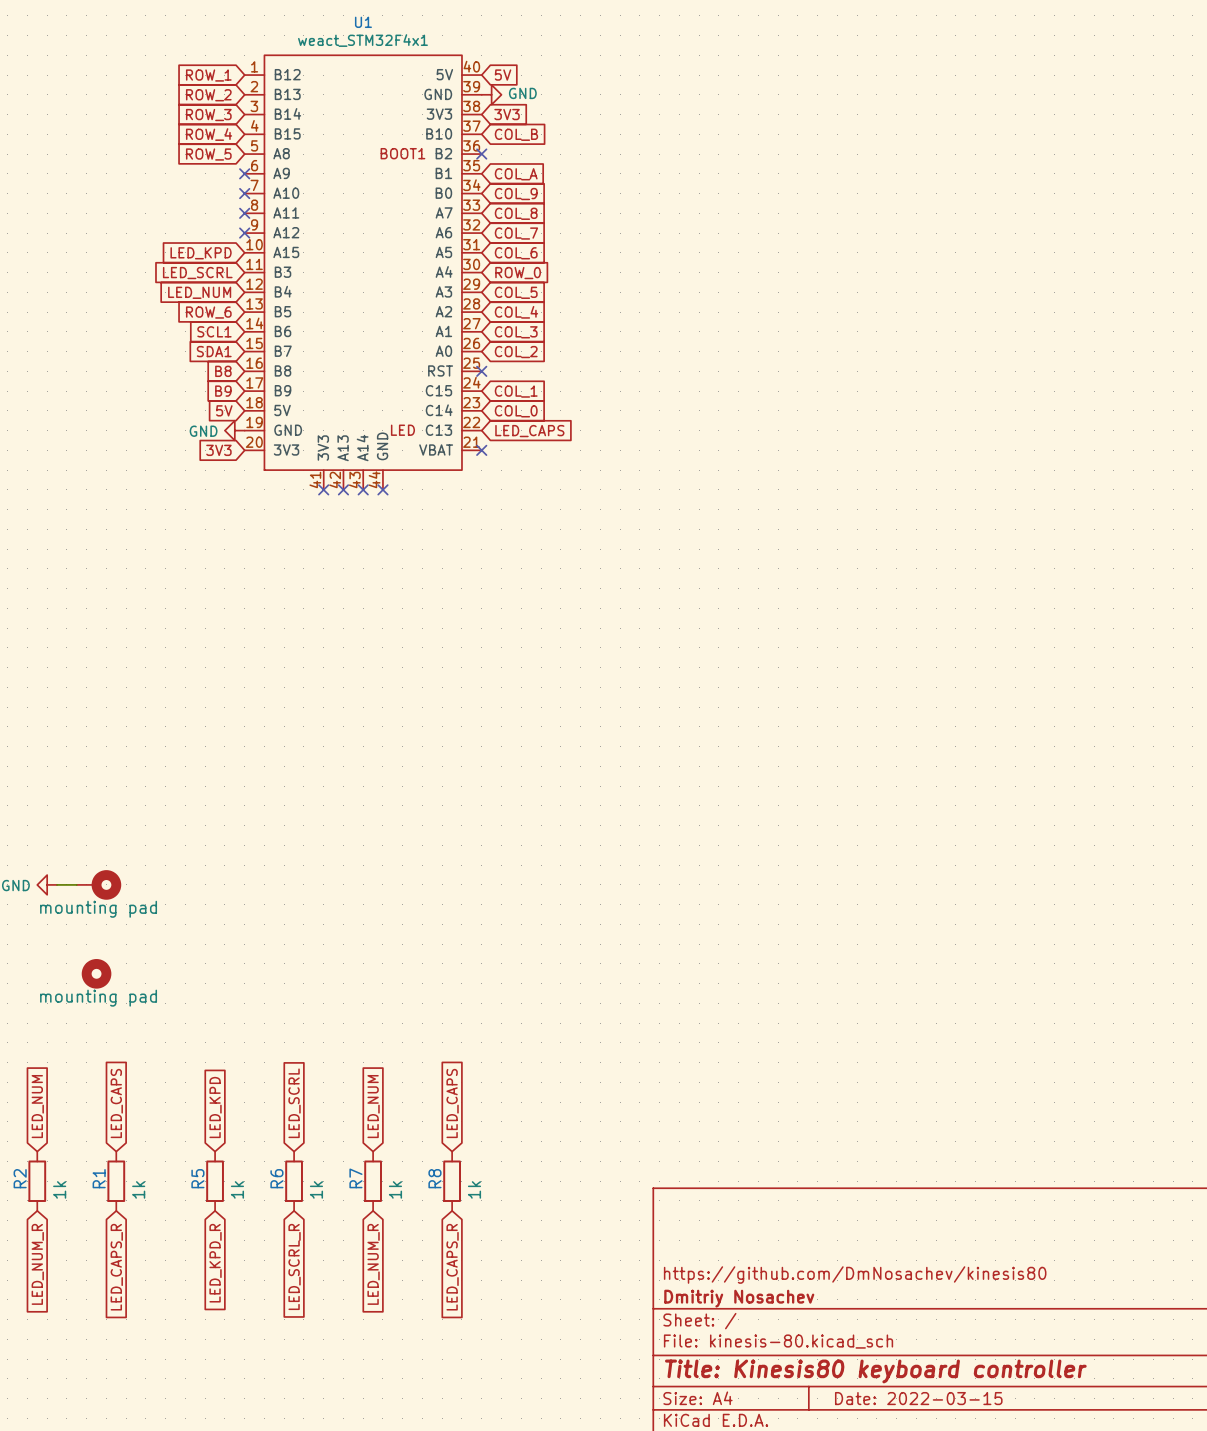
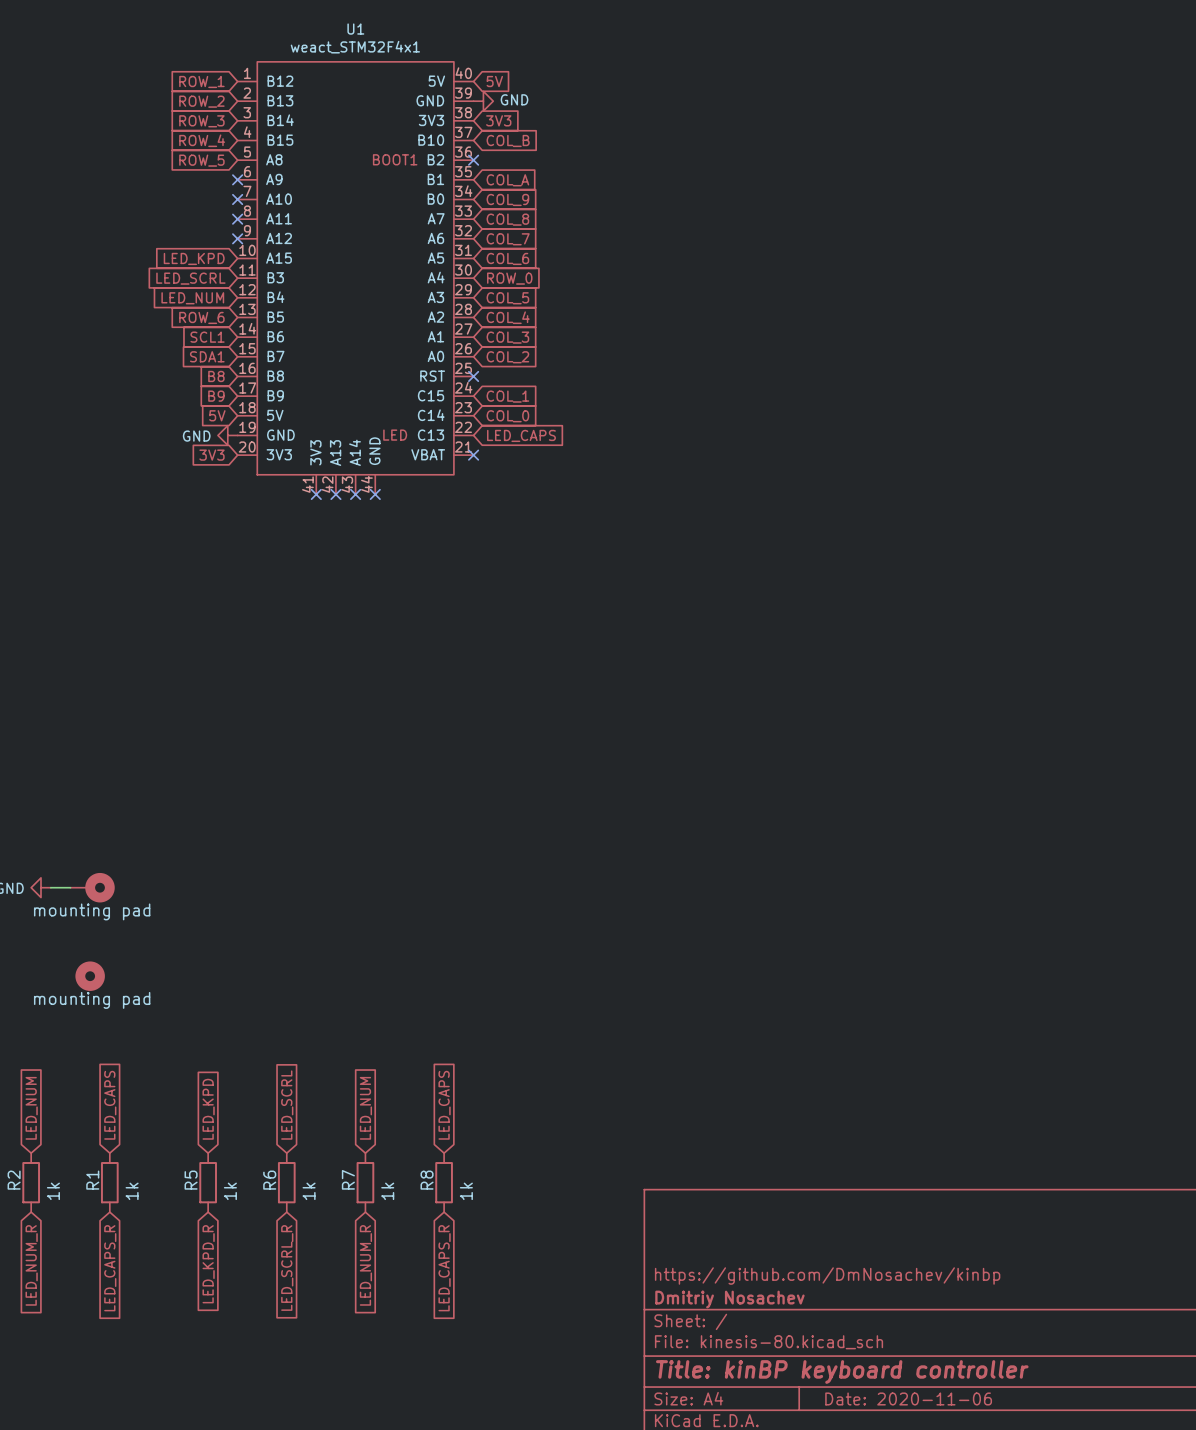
title block: https://github.com/DmNosachev/kinesis80 (855, 1275) -> https://github.com/DmNosachev/kinbp (827, 1276)
title block: Title: Kinesis80 keyboard controller (875, 1371) -> Title: kinBP keyboard controller (842, 1372)
title block: Date: 2022-03-15 (918, 1398) -> Date: 2020-11-06 (908, 1398)

